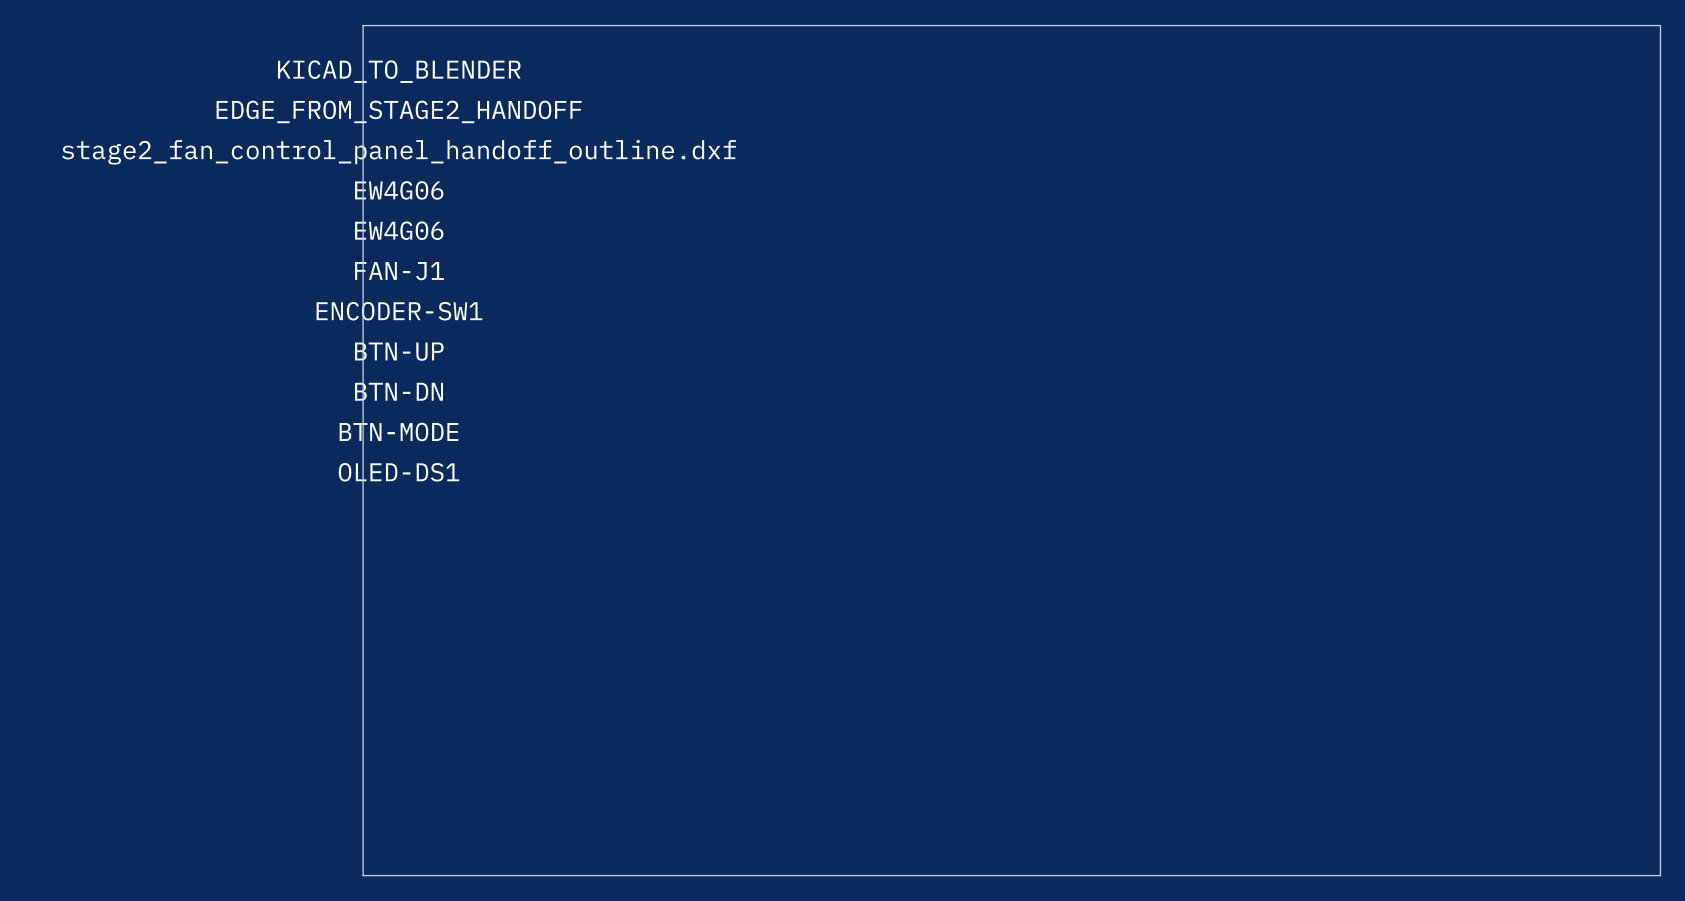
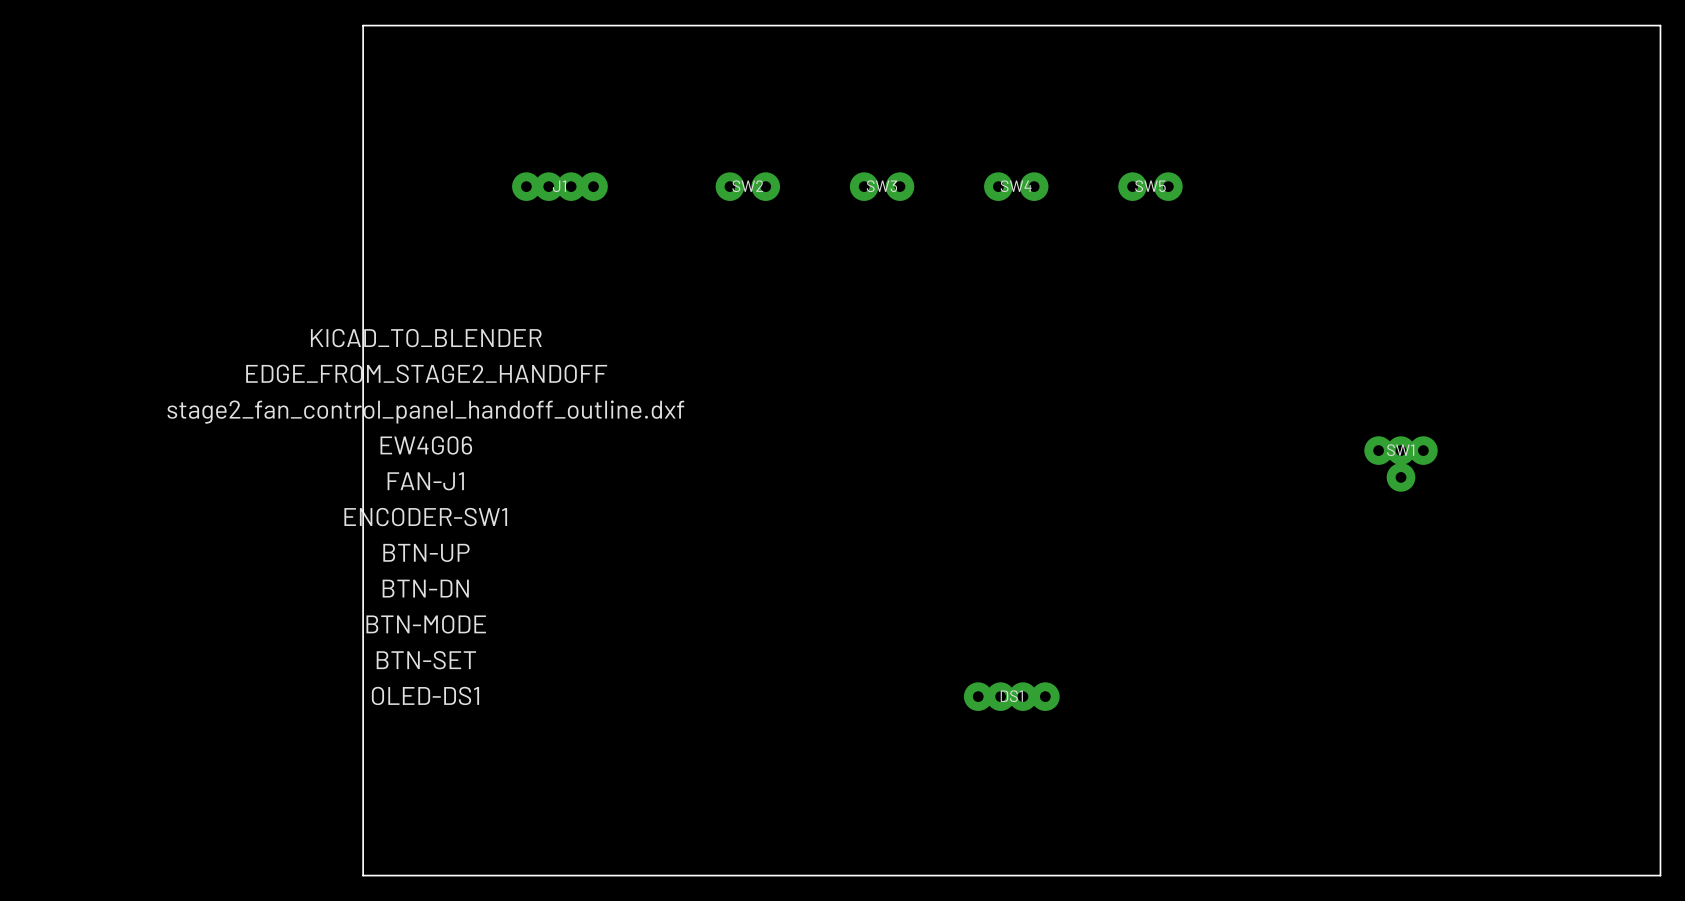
text: KICAD_TO_BLENDER (399, 71) -> none
text: EDGE_FROM_STAGE2_HANDOFF (399, 111) -> none
text: stage2_fan_control_panel_handoff_outline.dxf (399, 152) -> none
J1: none -> (559, 186)
SW2: none -> (747, 186)
SW3: none -> (882, 186)
SW4: none -> (1016, 186)
SW5: none -> (1150, 186)
text: EW4G06 (399, 190) -> none
text: EW4G06 (399, 230) -> none
text position: FAN-J1 (399, 271) -> FAN-J1 (425, 481)
text position: ENCODER-SW1 (399, 311) -> ENCODER-SW1 (425, 517)
text: none -> KICAD_TO_BLENDER (426, 338)
text position: BTN-UP (399, 351) -> BTN-UP (426, 552)
text: none -> EDGE_FROM_STAGE2_HANDOFF (426, 373)
text position: BTN-DN (399, 391) -> BTN-DN (425, 588)
text: none -> stage2_fan_control_panel_handoff_outline.dxf (425, 412)
text position: BTN-MODE (399, 432) -> BTN-MODE (426, 624)
text: none -> EW4G06 (426, 445)
SW1: none -> (1401, 464)
text: OLED-DS1 (399, 472) -> none
text: none -> BTN-SET (426, 660)
text: none -> OLED-DS1 (425, 695)
DS1: none -> (1011, 696)

